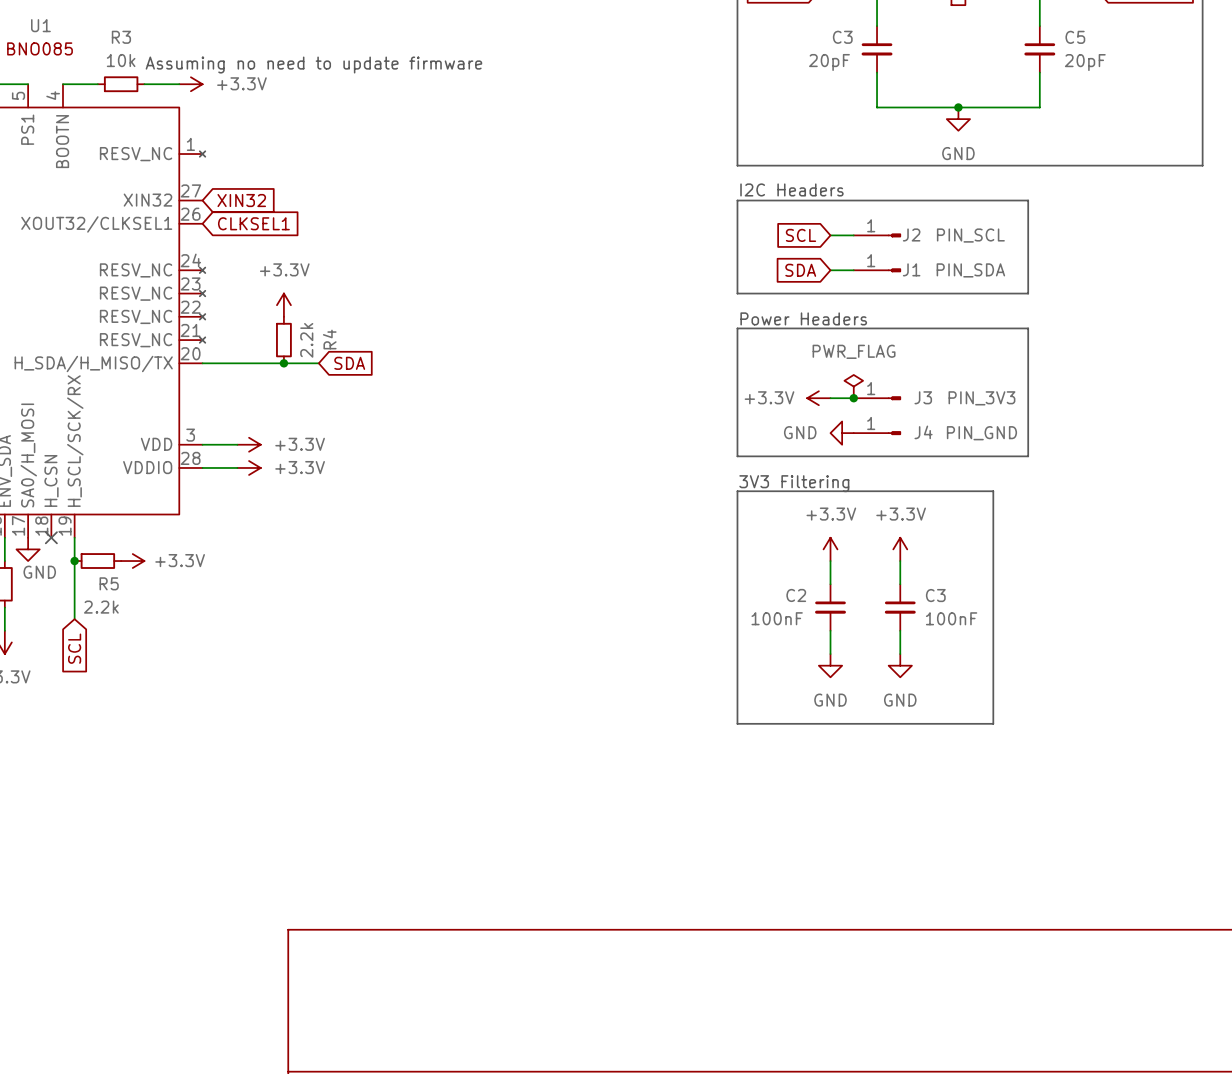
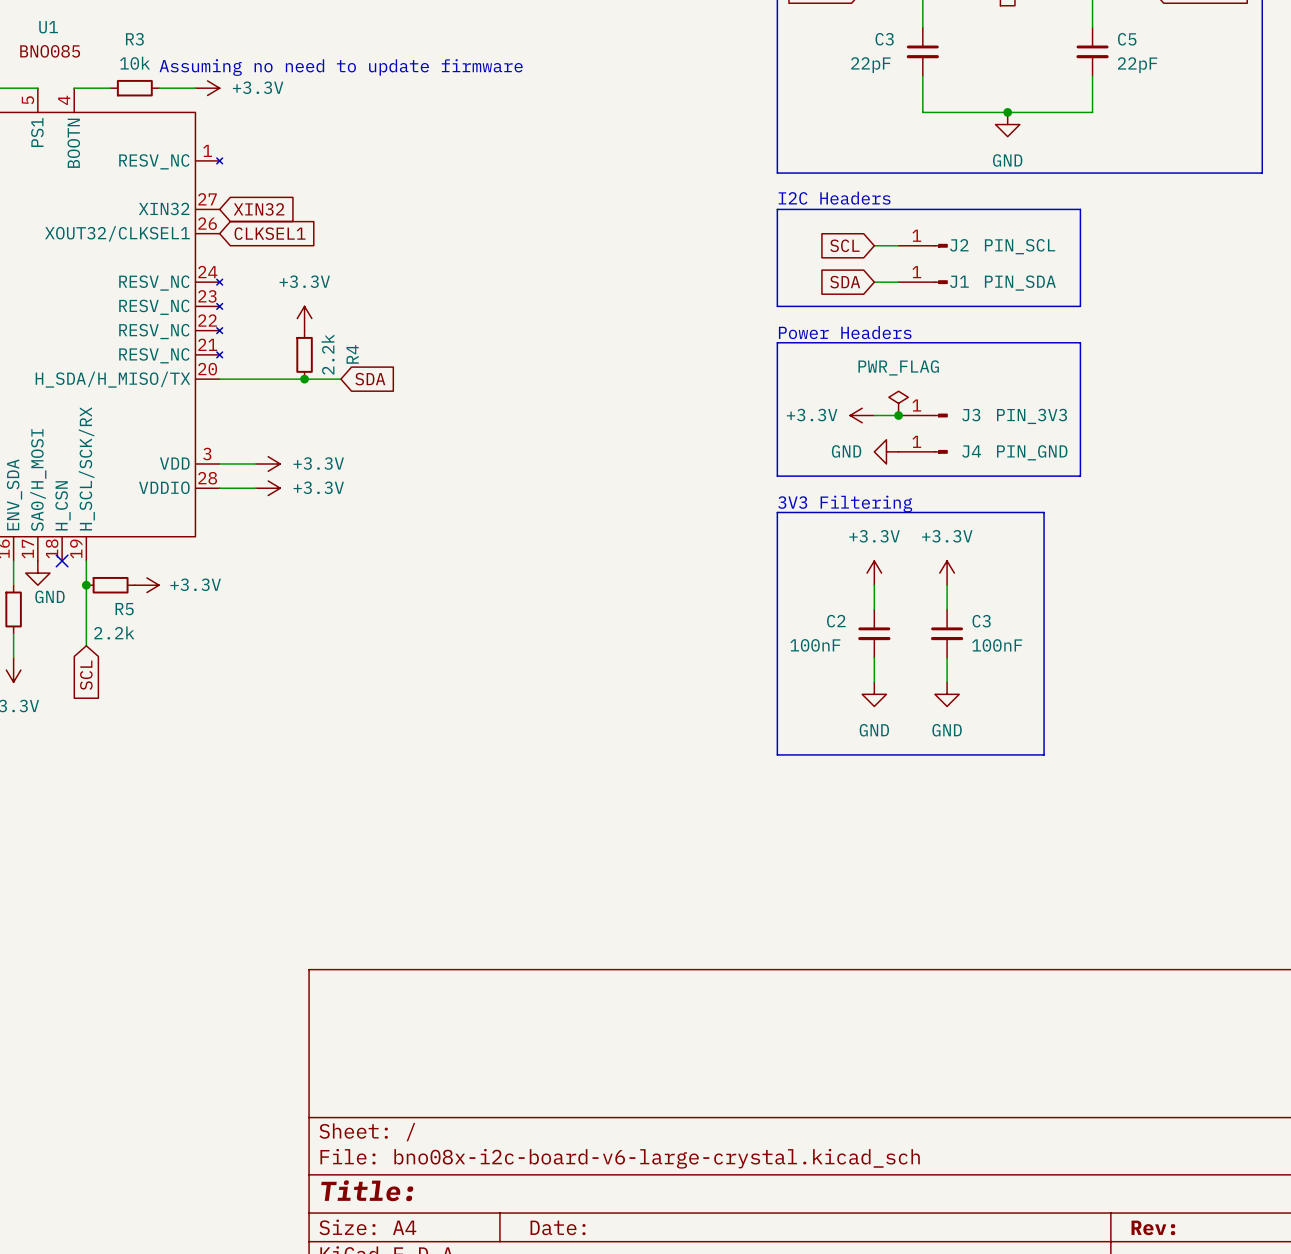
C3 value: 20pF (829, 62) -> 22pF (870, 65)
C5 value: 20pF (1085, 62) -> 22pF (1137, 65)

